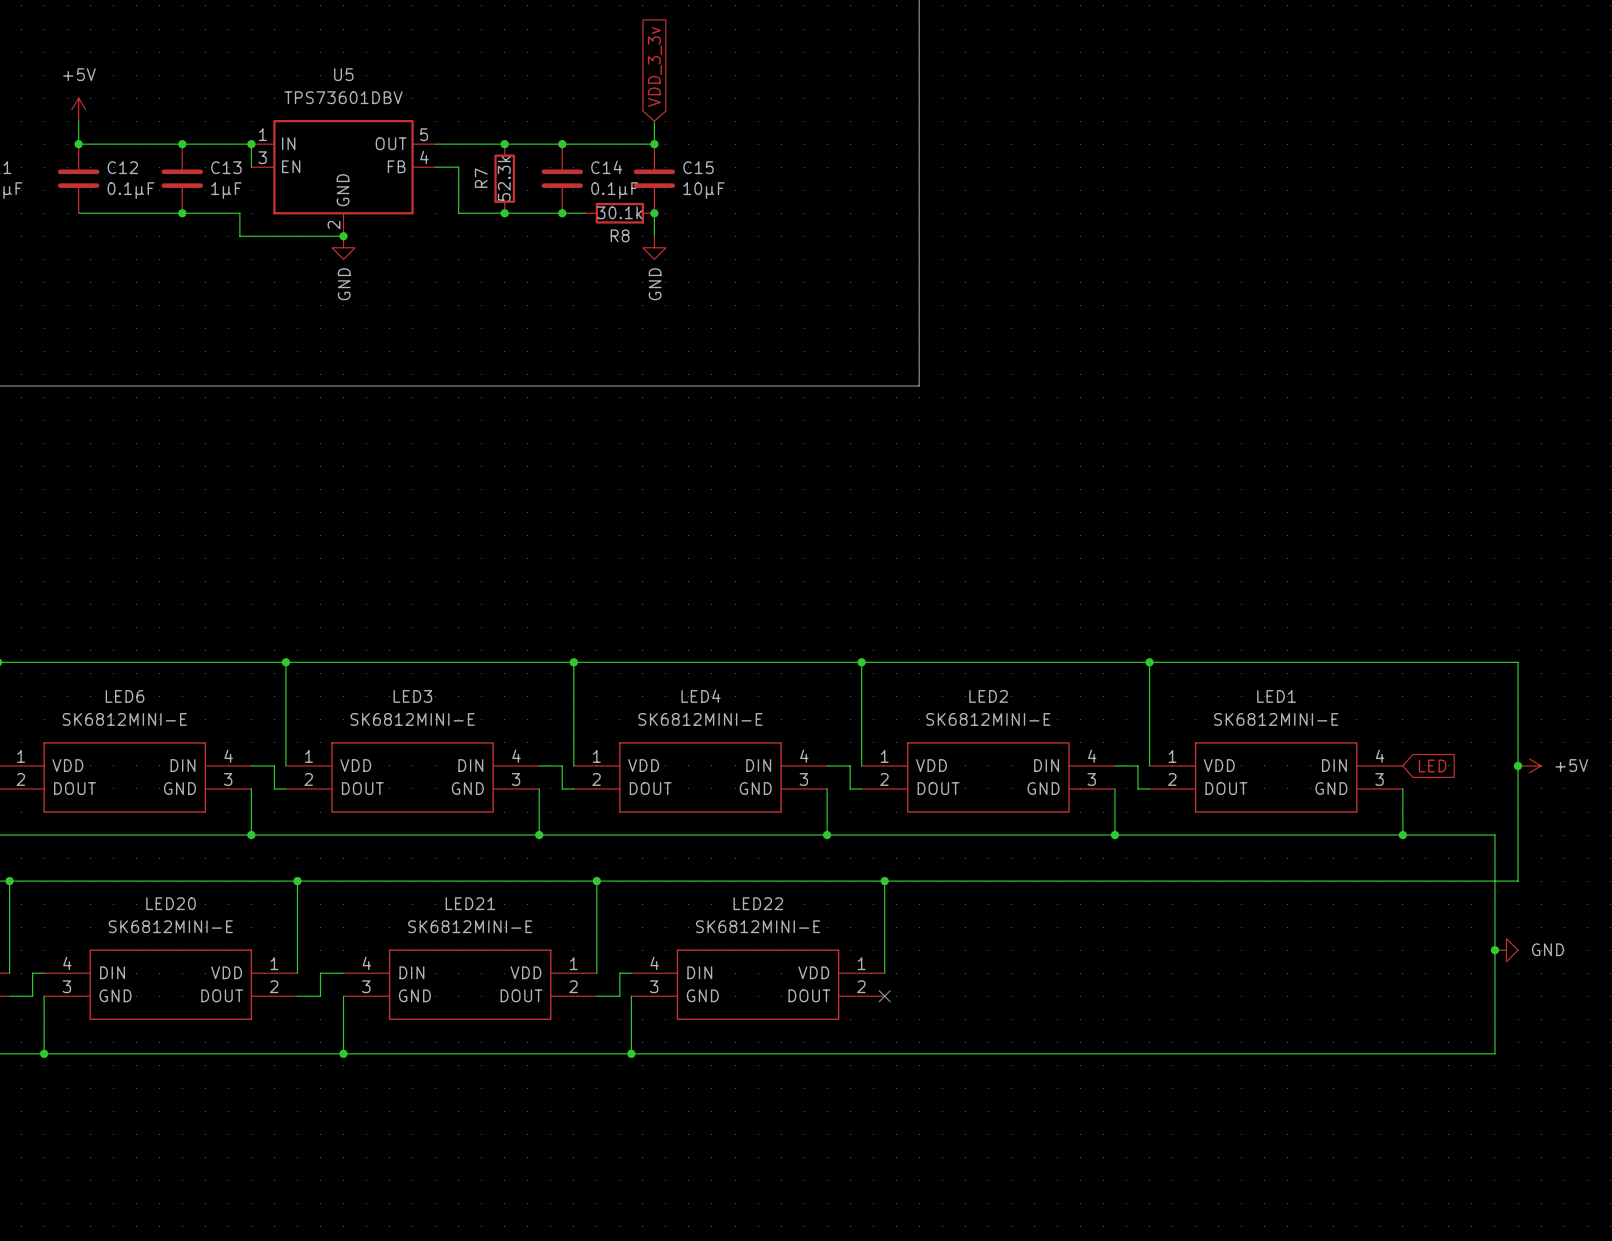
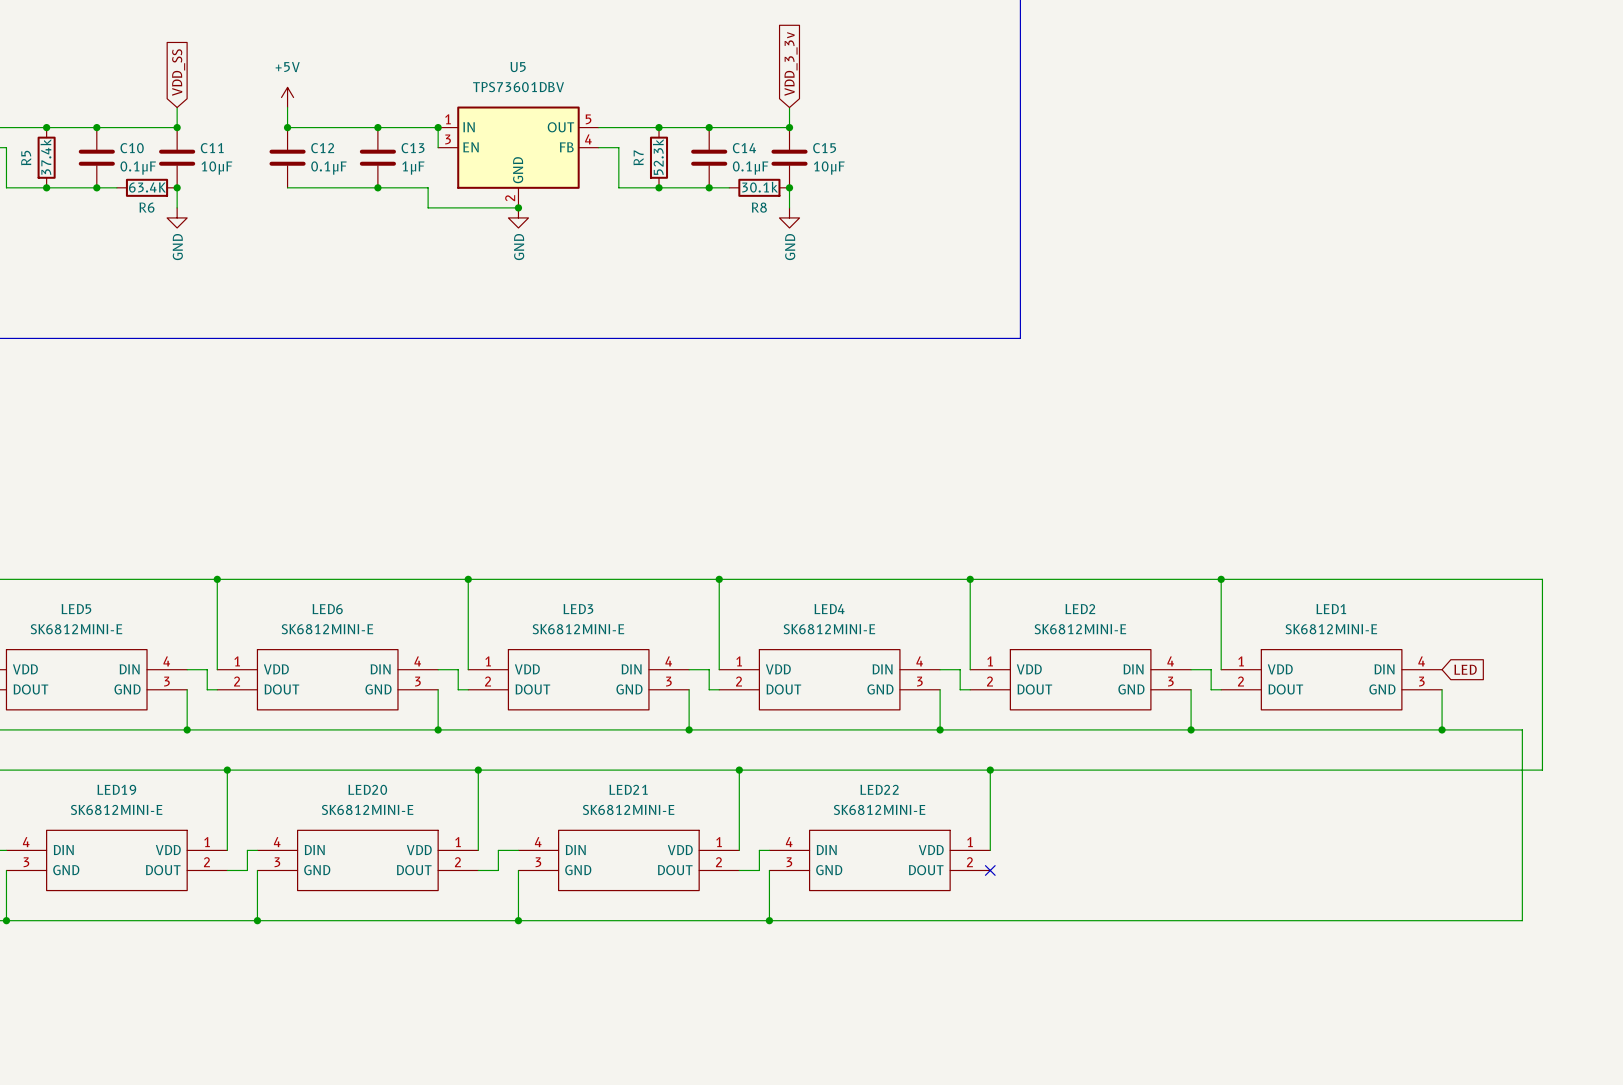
junction: (1518, 765) -> none
power symbol: +5V (1529, 765) -> none
junction: (1494, 950) -> none
power symbol: GND (1506, 950) -> none

